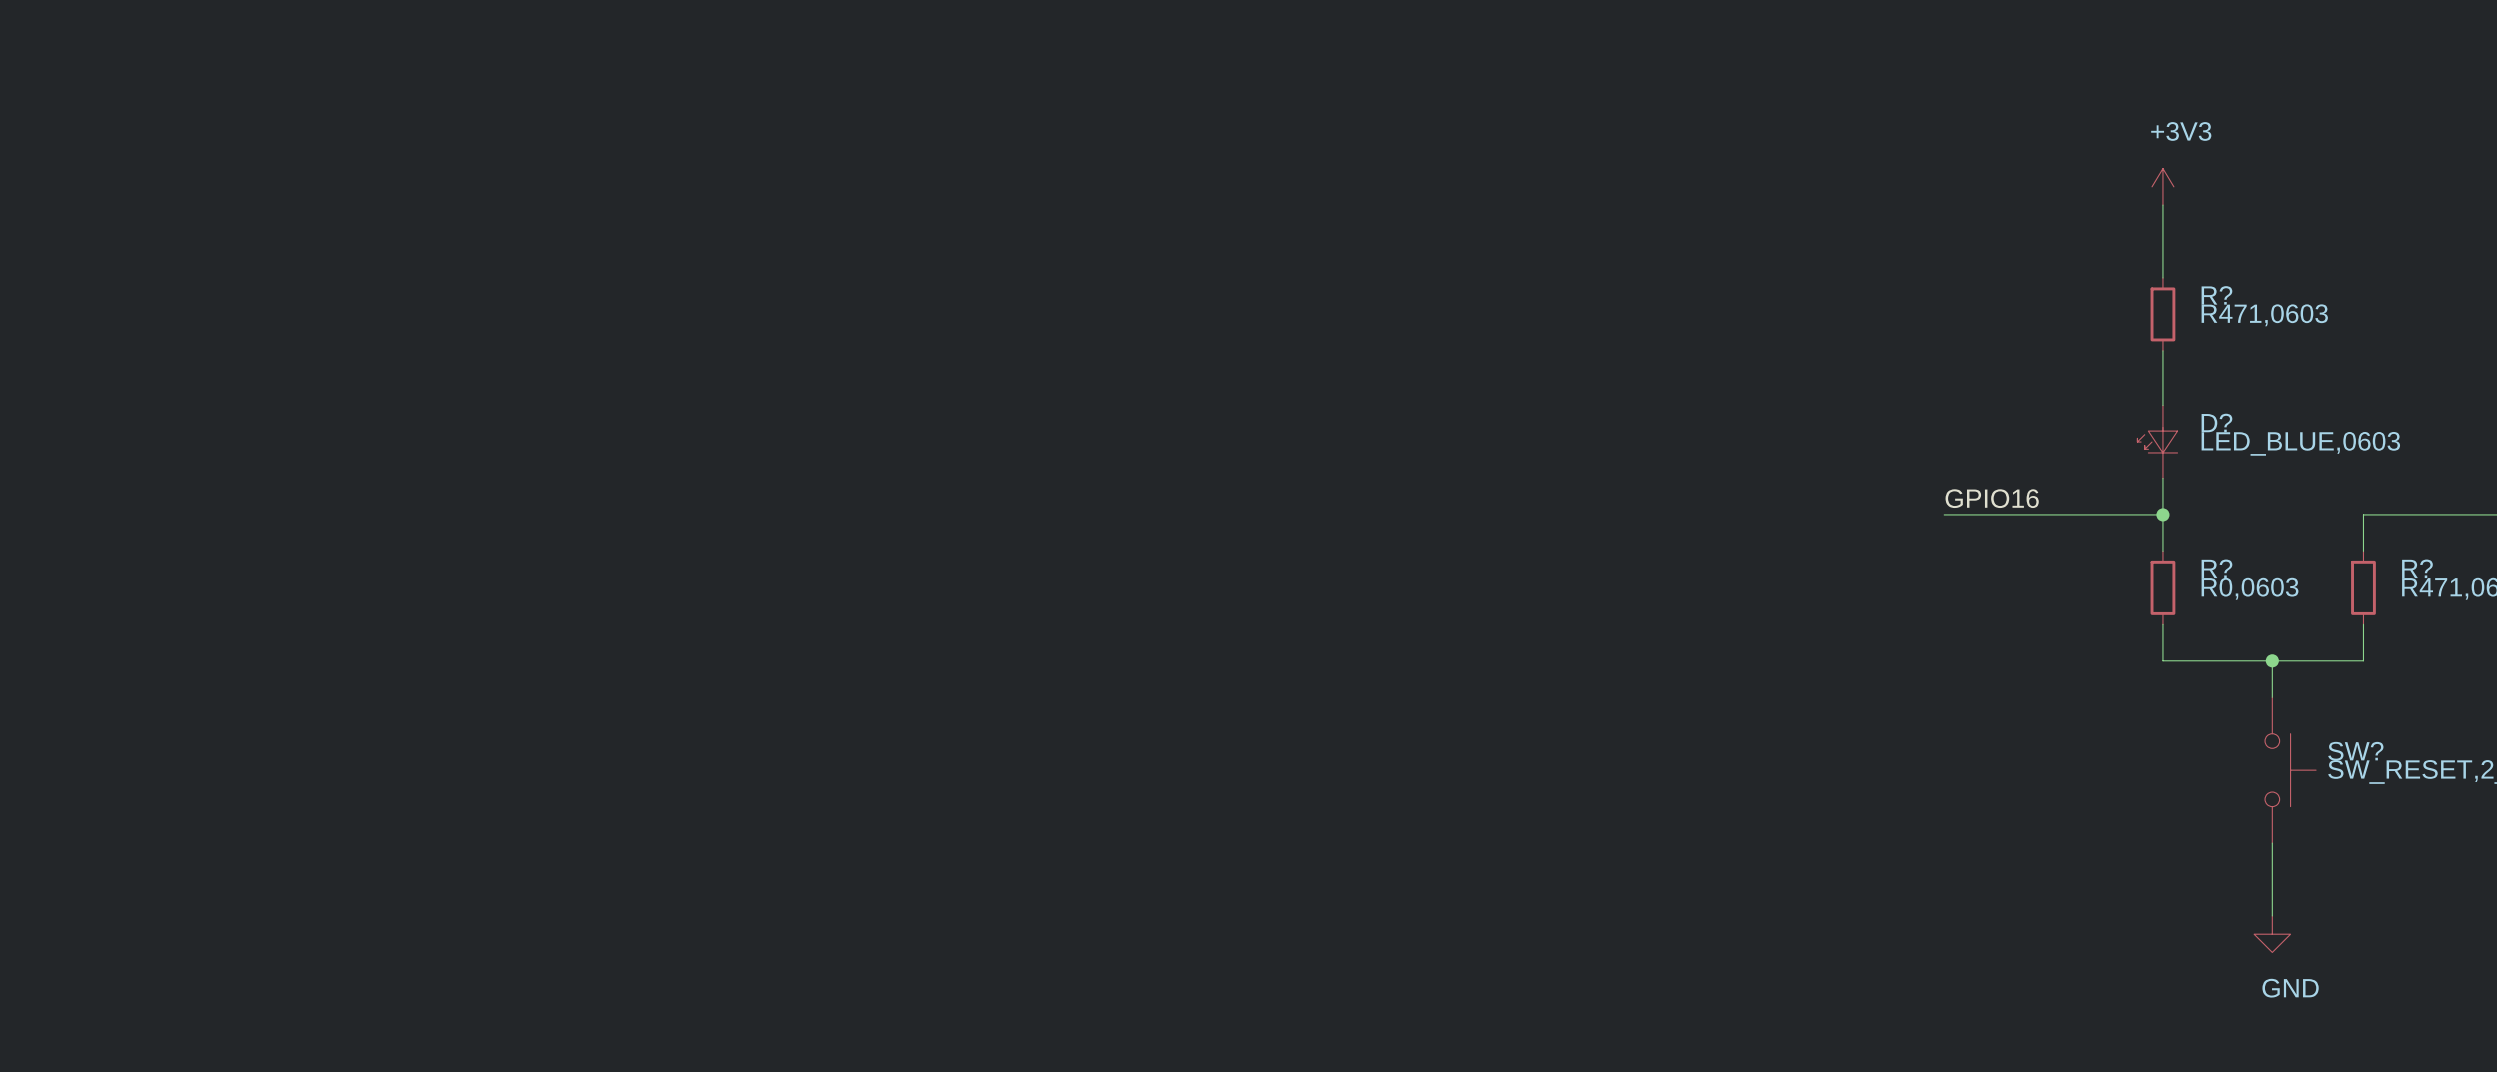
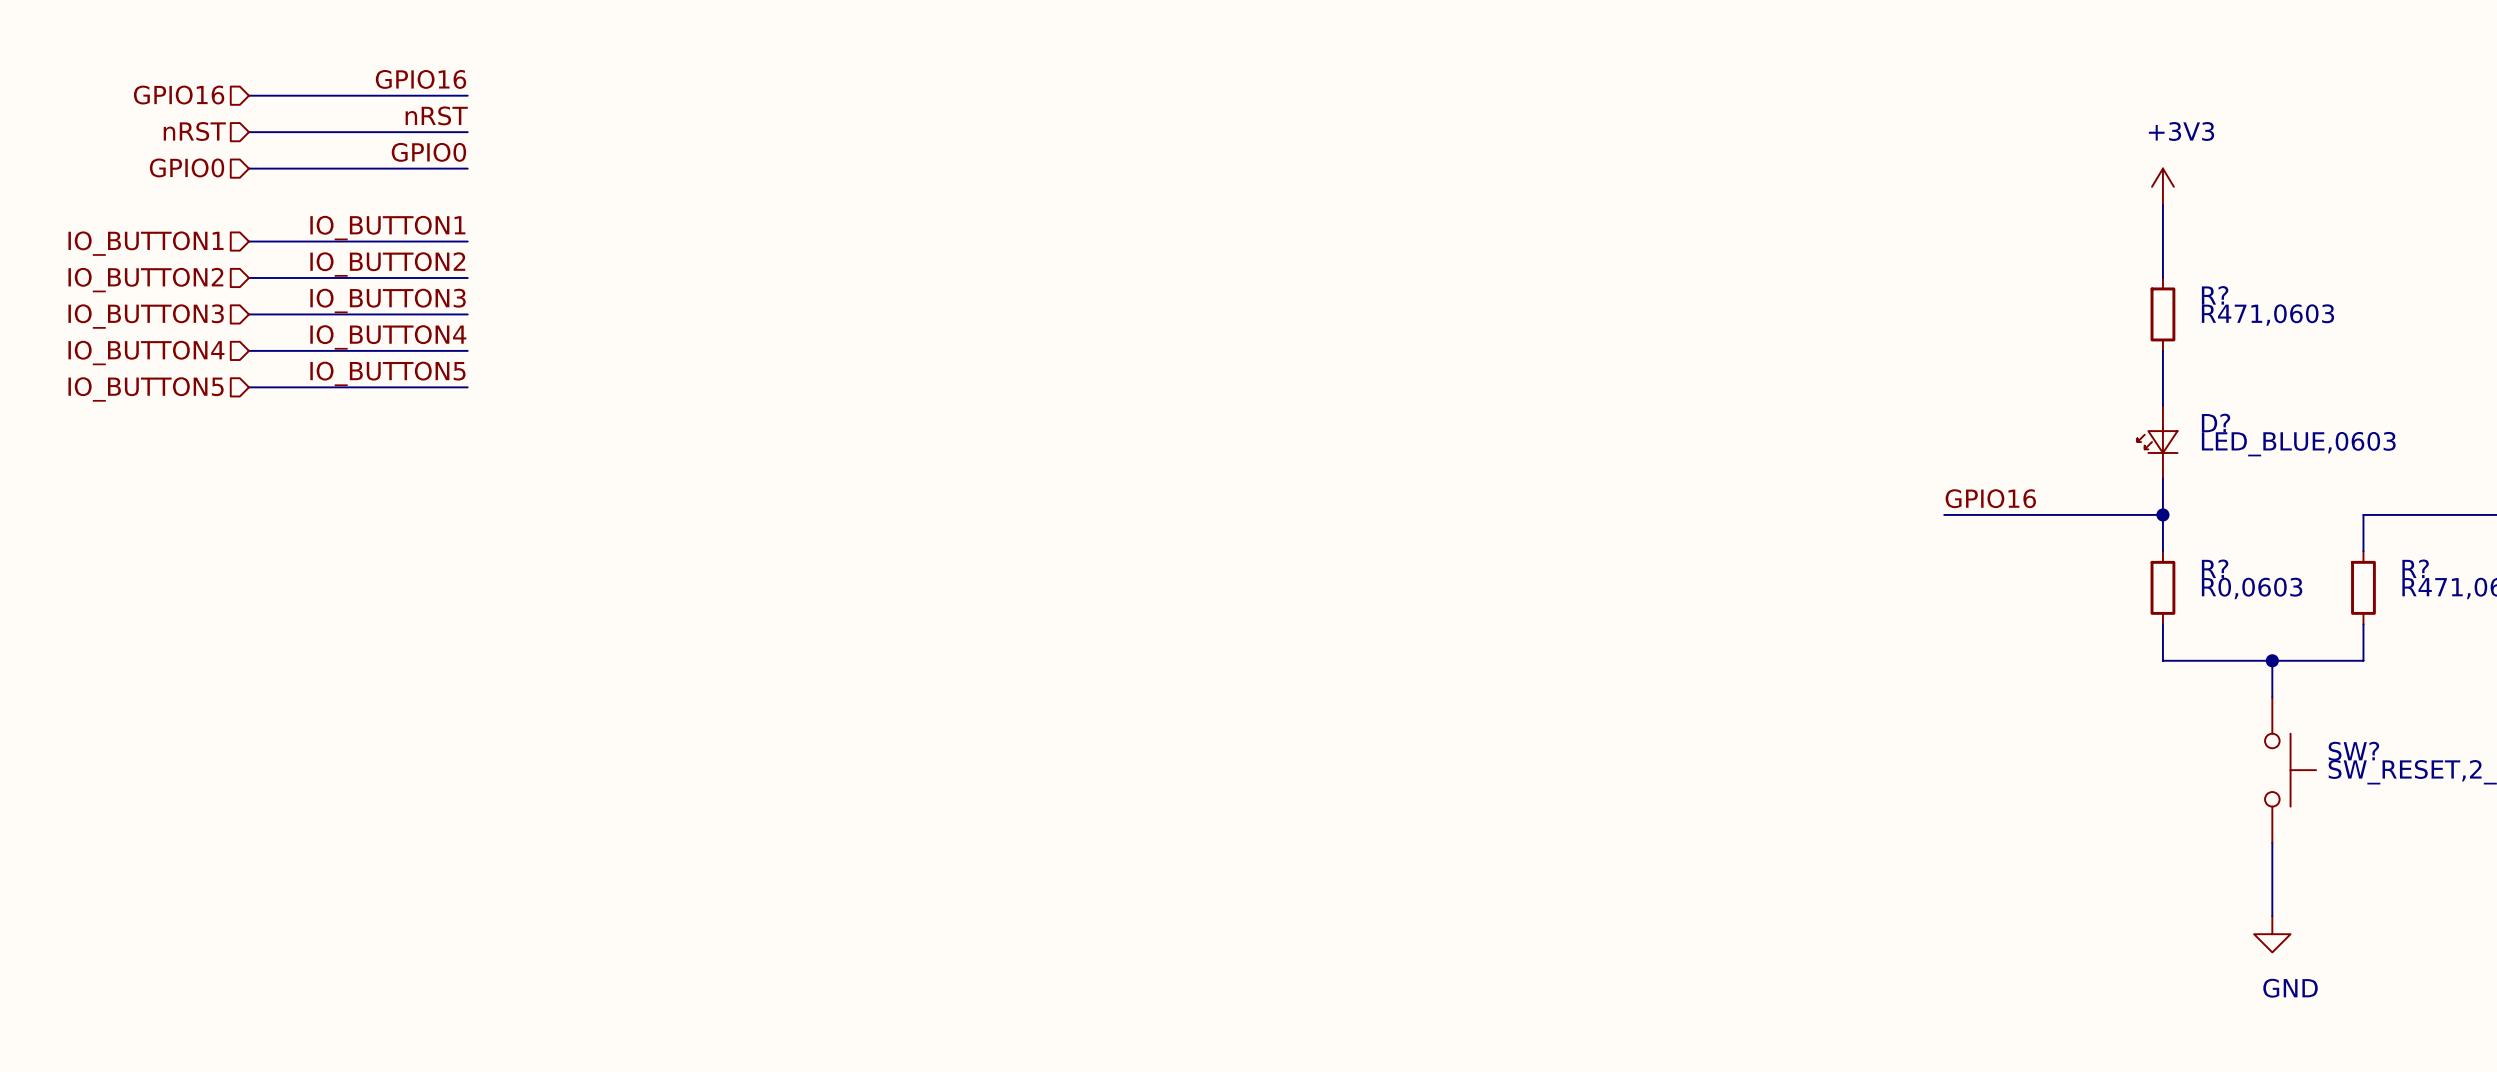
label: none -> GPIO16 (420, 79)
hierarchical label: none -> GPIO16 (179, 95)
wire: none -> (248, 95) (467, 95)
label: none -> nRST (436, 115)
hierarchical label: none -> nRST (194, 131)
wire: none -> (248, 132) (467, 132)
label: none -> GPIO0 (428, 152)
hierarchical label: none -> GPIO0 (187, 167)
wire: none -> (248, 168) (467, 168)
label: none -> IO_BUTTON1 (387, 228)
wire: none -> (248, 241) (467, 241)
hierarchical label: none -> IO_BUTTON1 (145, 243)
label: none -> IO_BUTTON2 (387, 264)
wire: none -> (248, 277) (467, 277)
hierarchical label: none -> IO_BUTTON2 (145, 280)
label: none -> IO_BUTTON3 (388, 300)
wire: none -> (248, 314) (467, 314)
hierarchical label: none -> IO_BUTTON3 (146, 316)
label: none -> IO_BUTTON4 (388, 337)
wire: none -> (248, 350) (467, 350)
hierarchical label: none -> IO_BUTTON4 (146, 353)
label: none -> IO_BUTTON5 (387, 373)
wire: none -> (248, 387) (467, 387)
hierarchical label: none -> IO_BUTTON5 (146, 389)

